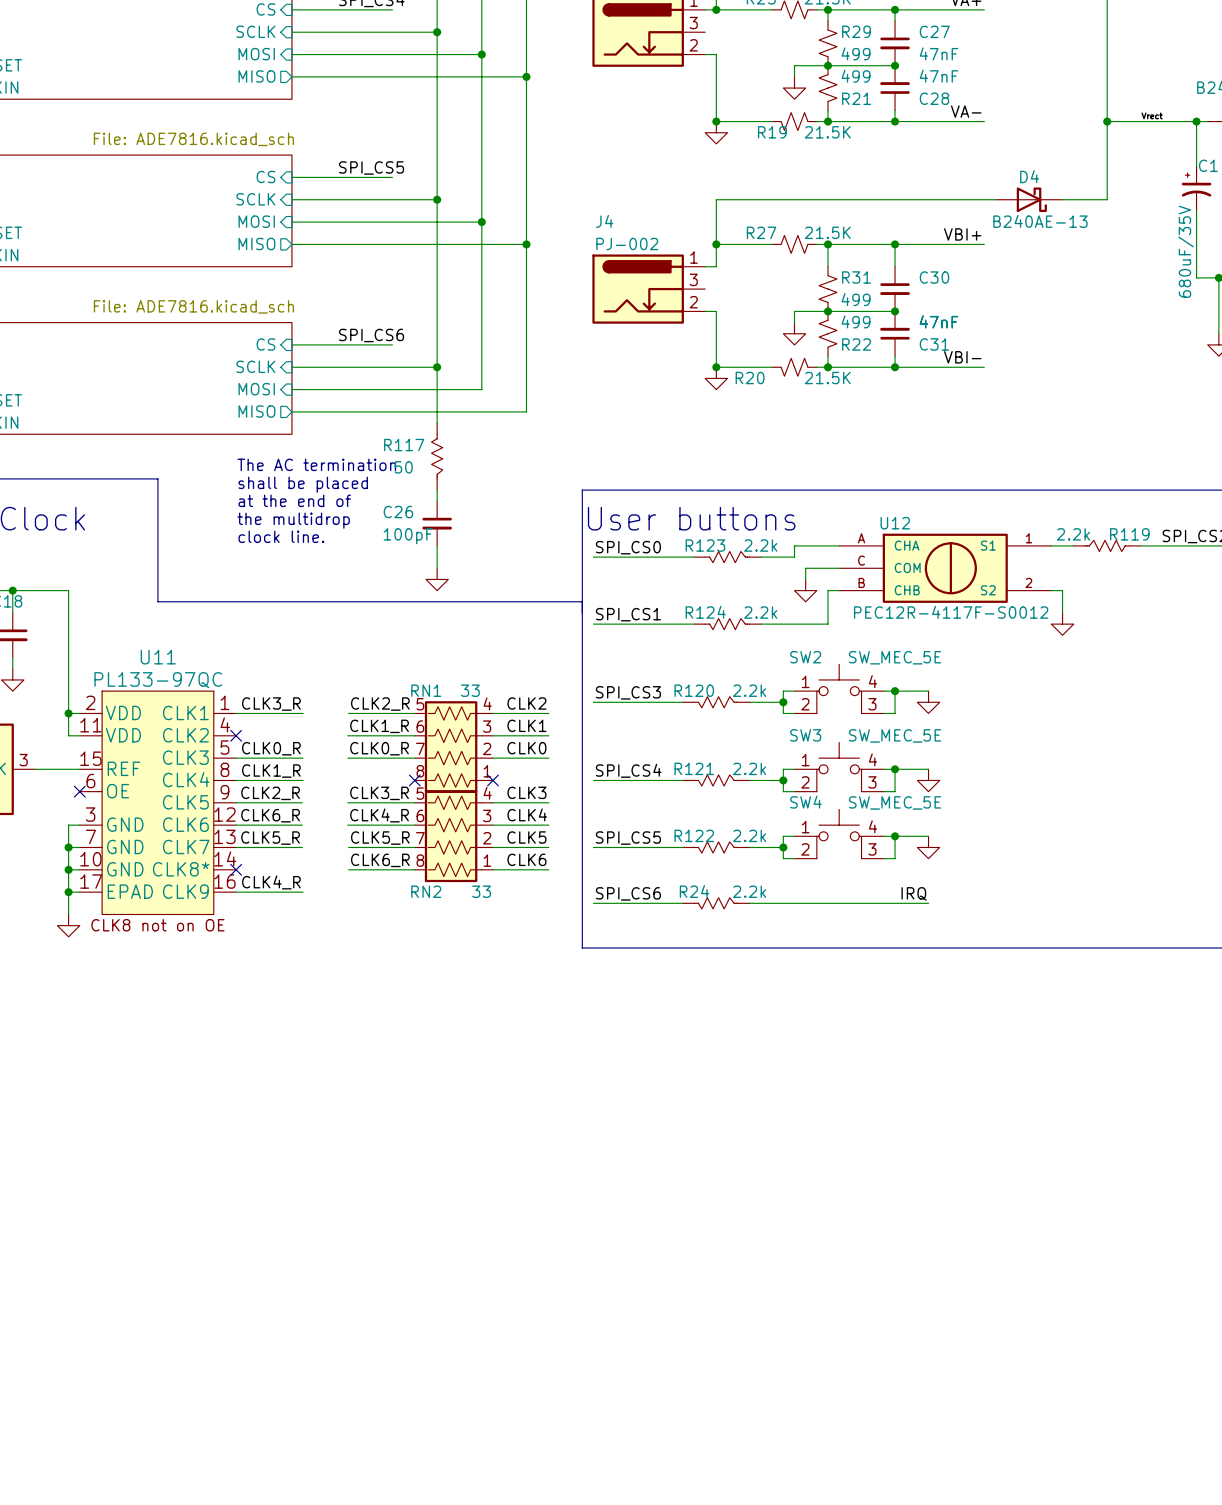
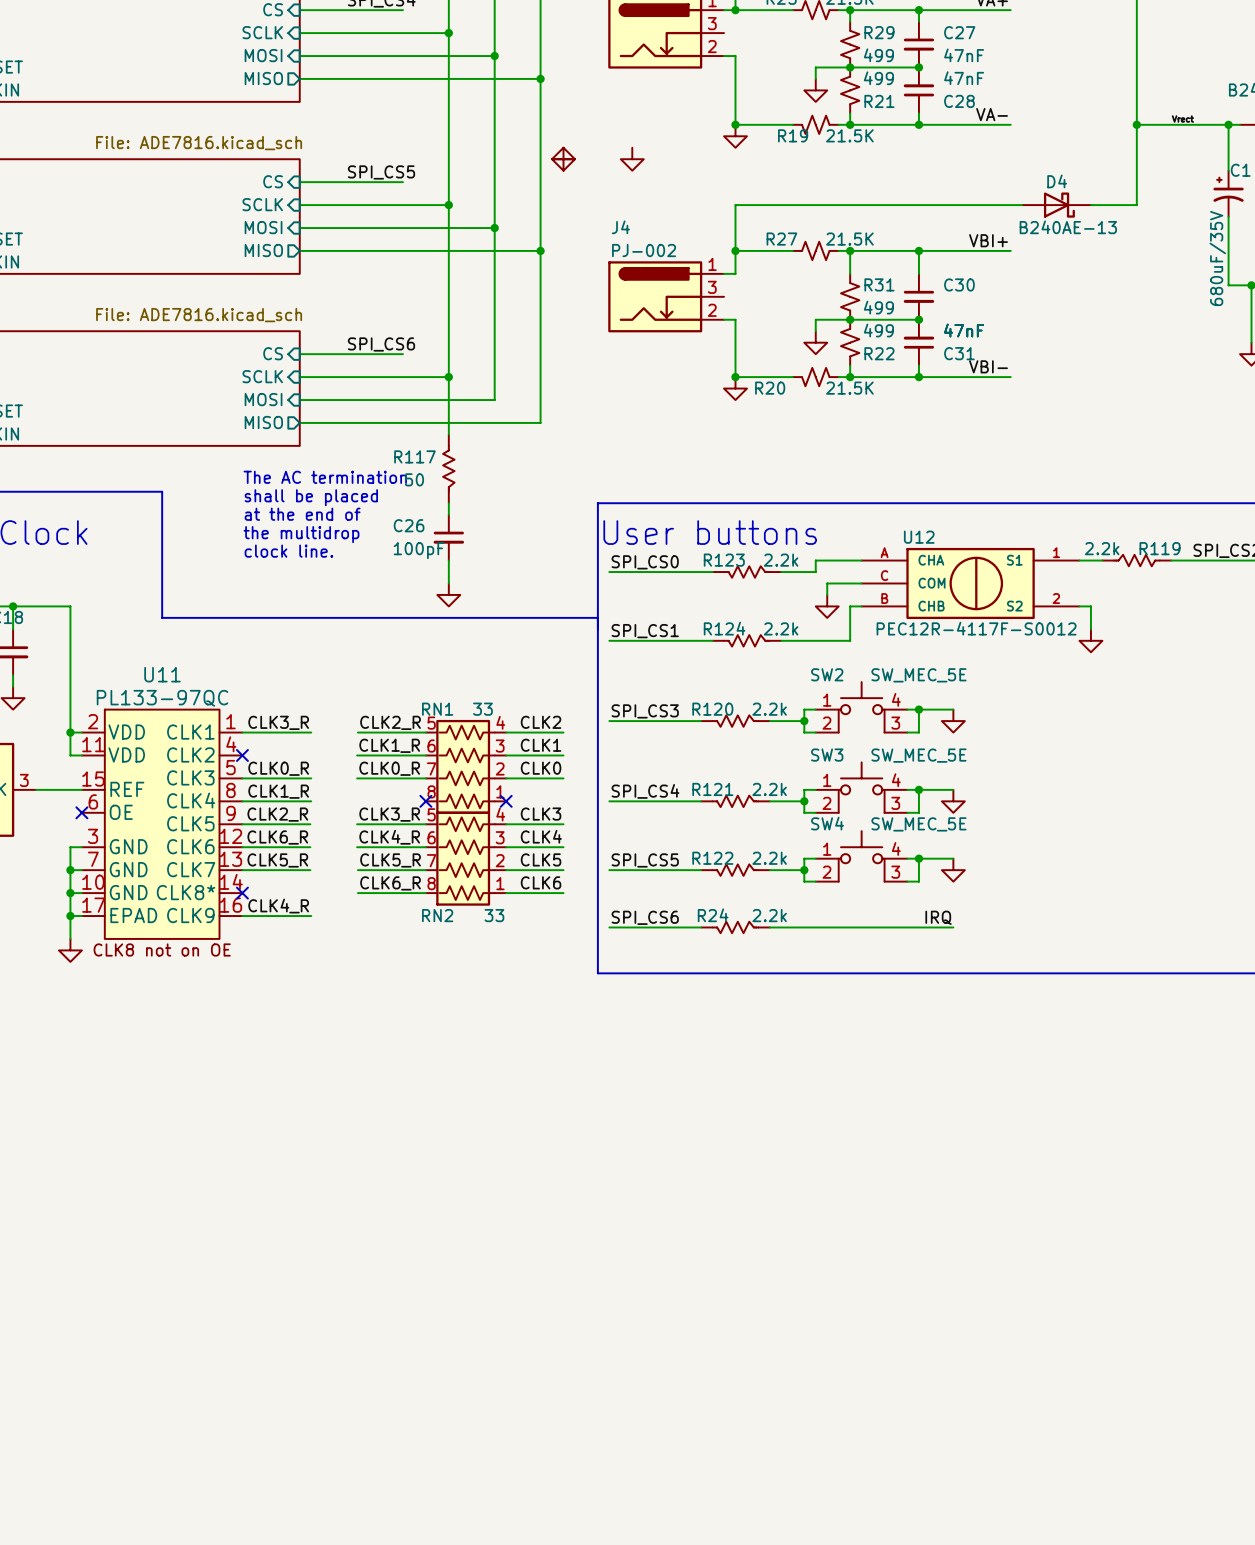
power symbol: none -> (563, 159)
power symbol: none -> (563, 159)
power symbol: none -> (632, 159)

